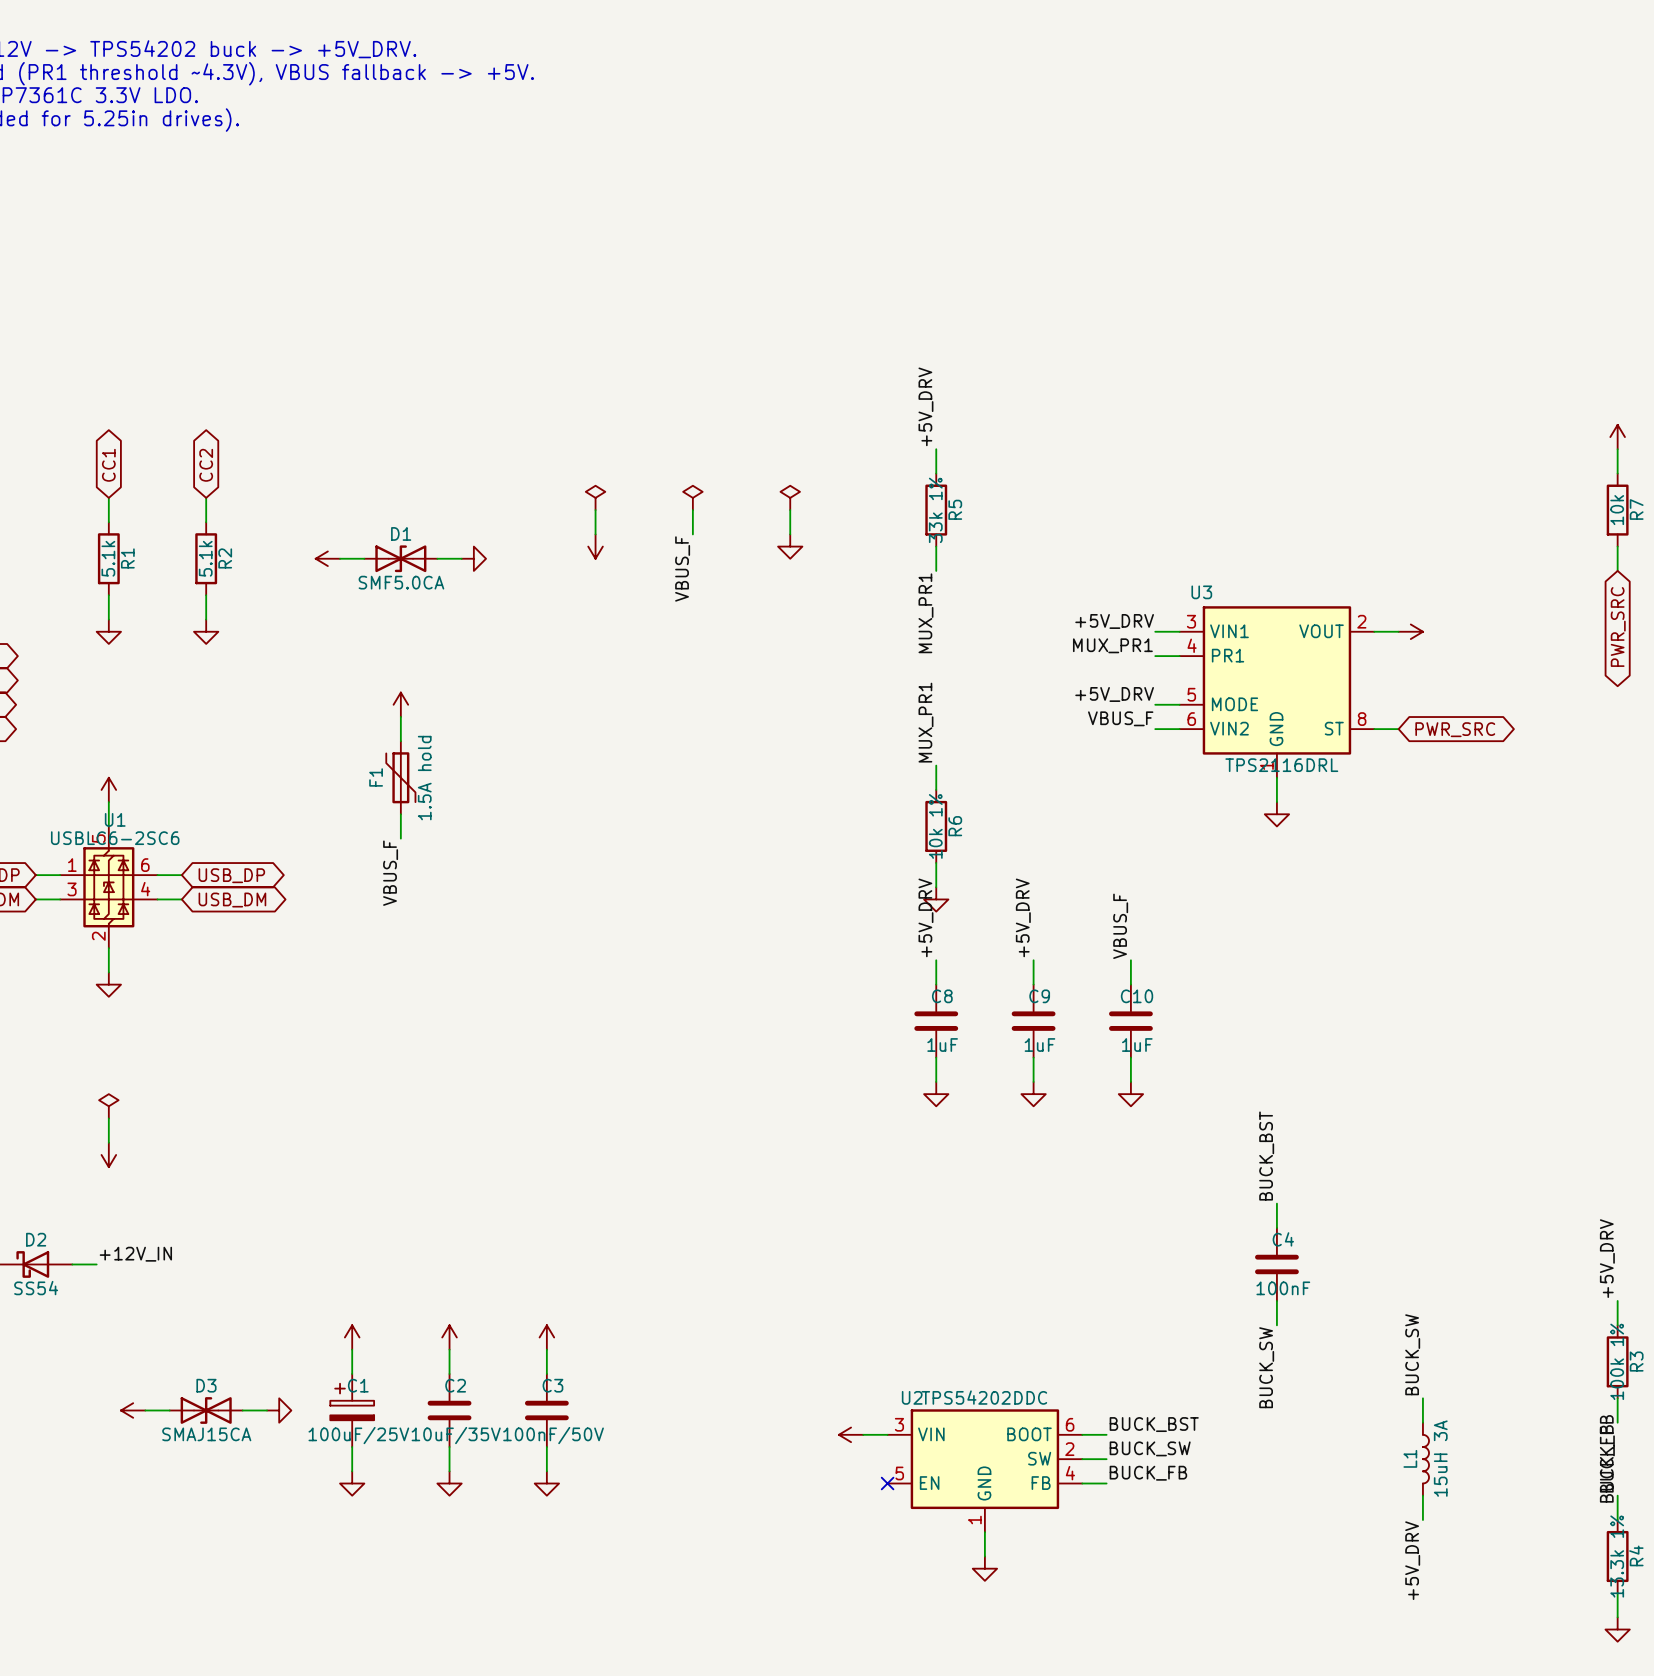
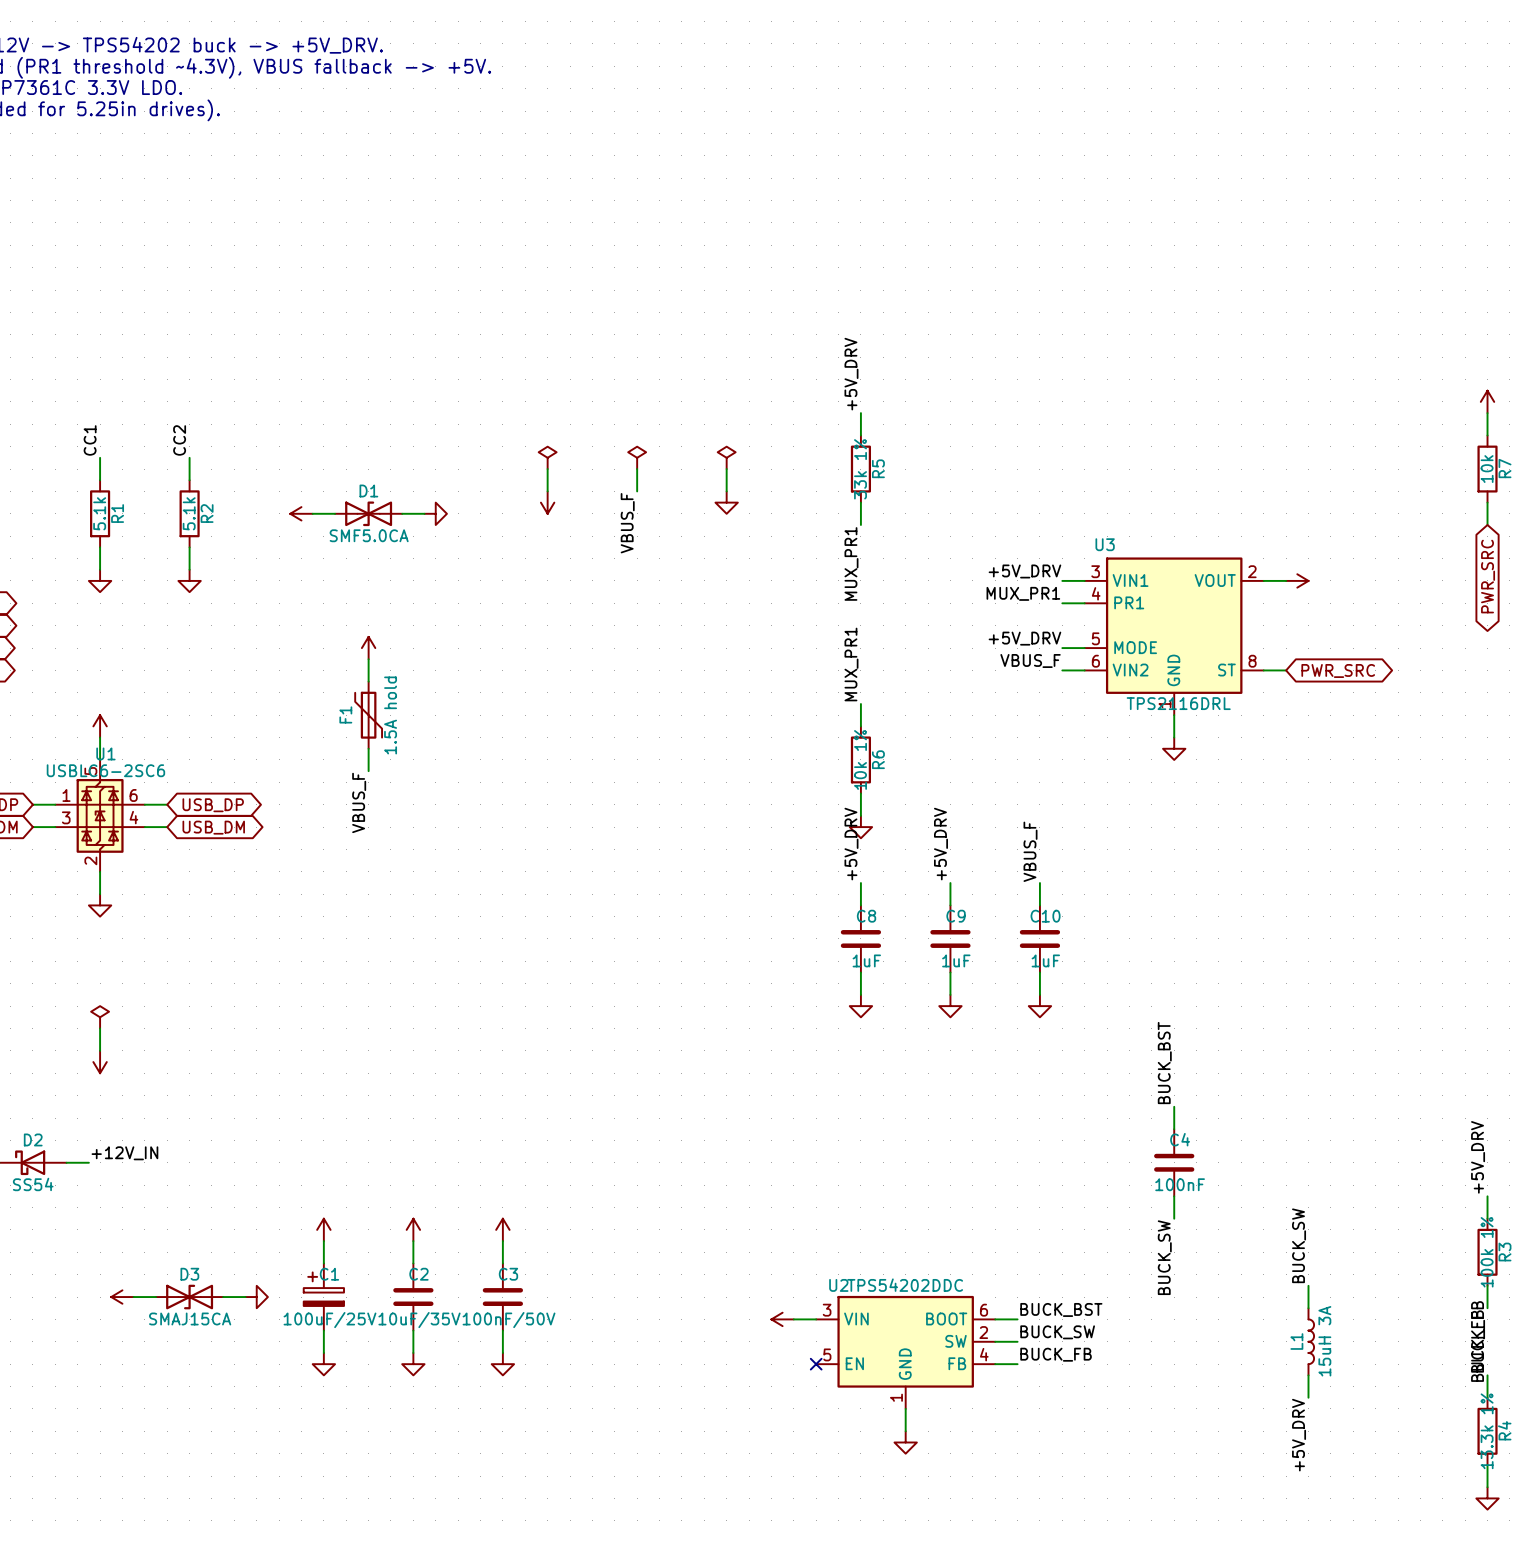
global label: CC1 (108, 465) -> none
global label: CC2 (206, 465) -> none
label: none -> CC1 (90, 440)
label: none -> CC2 (179, 440)

